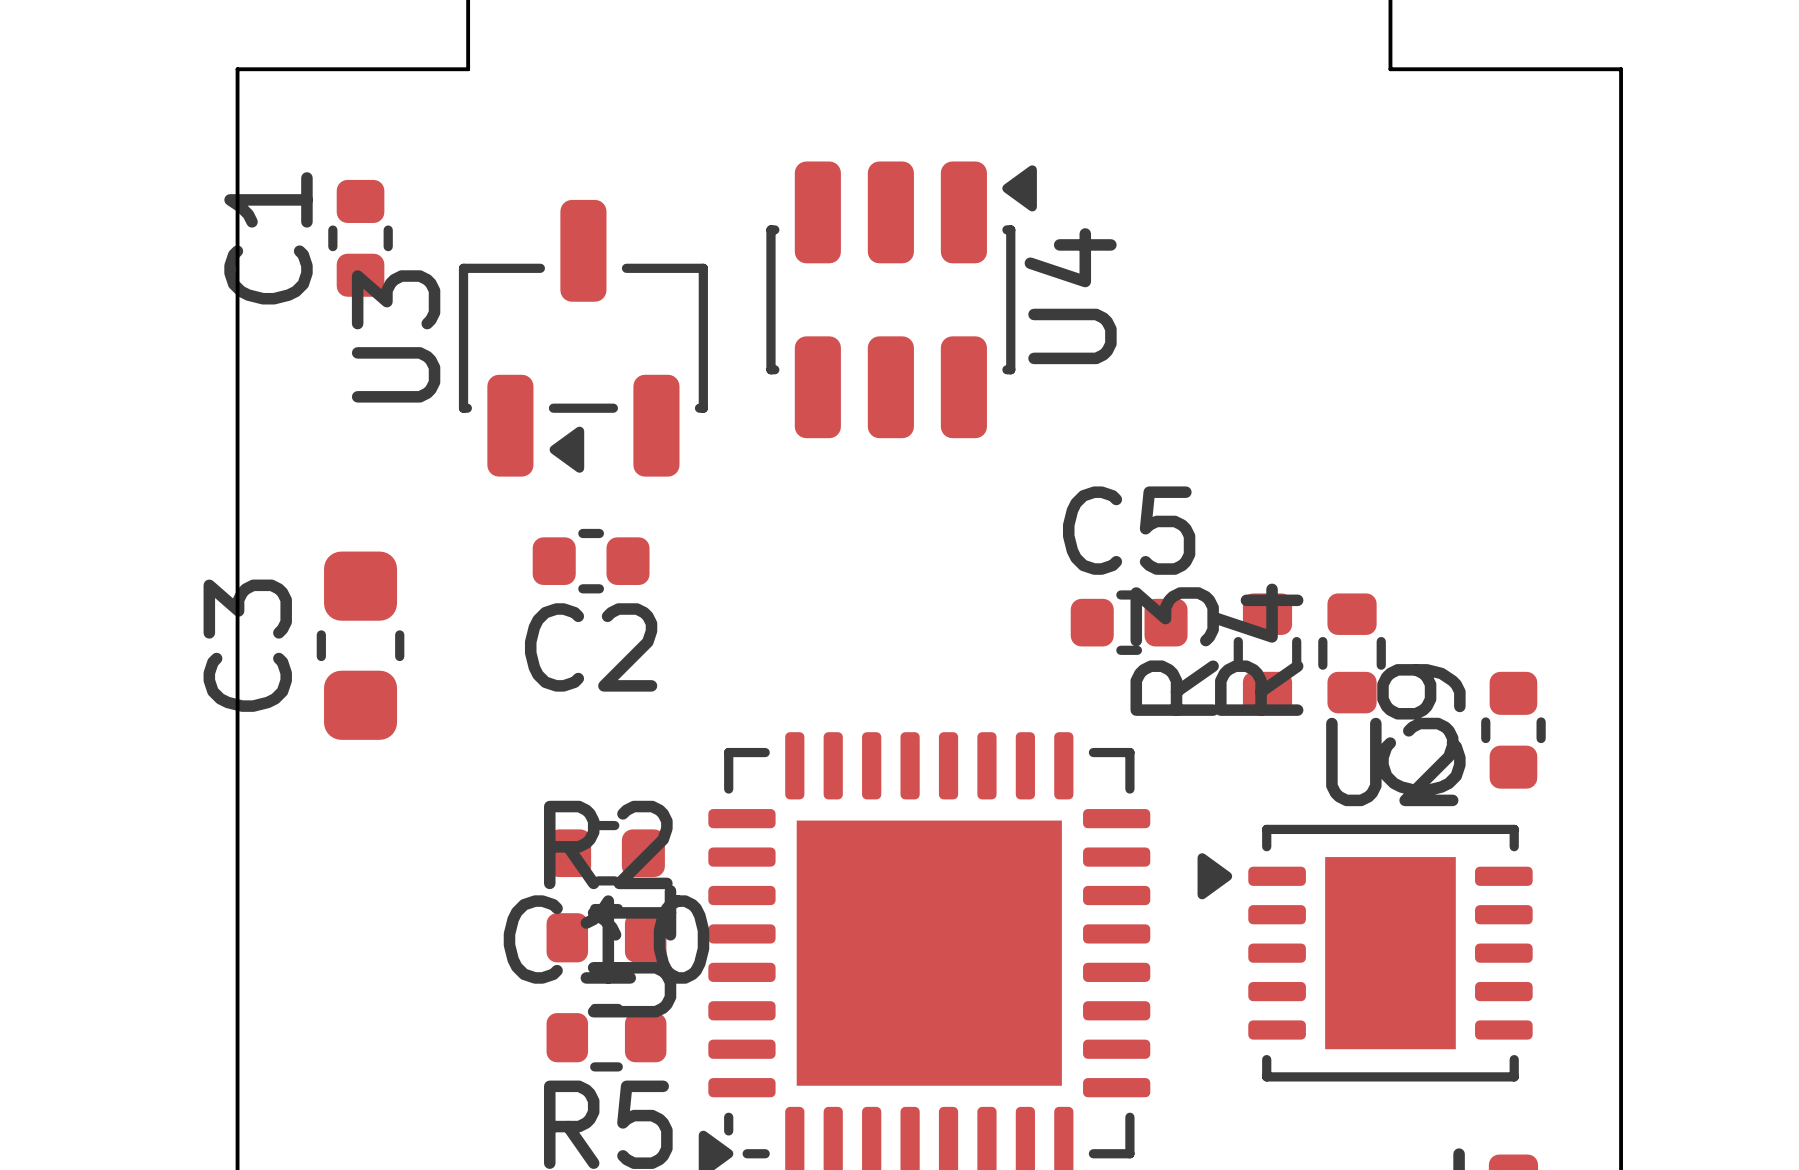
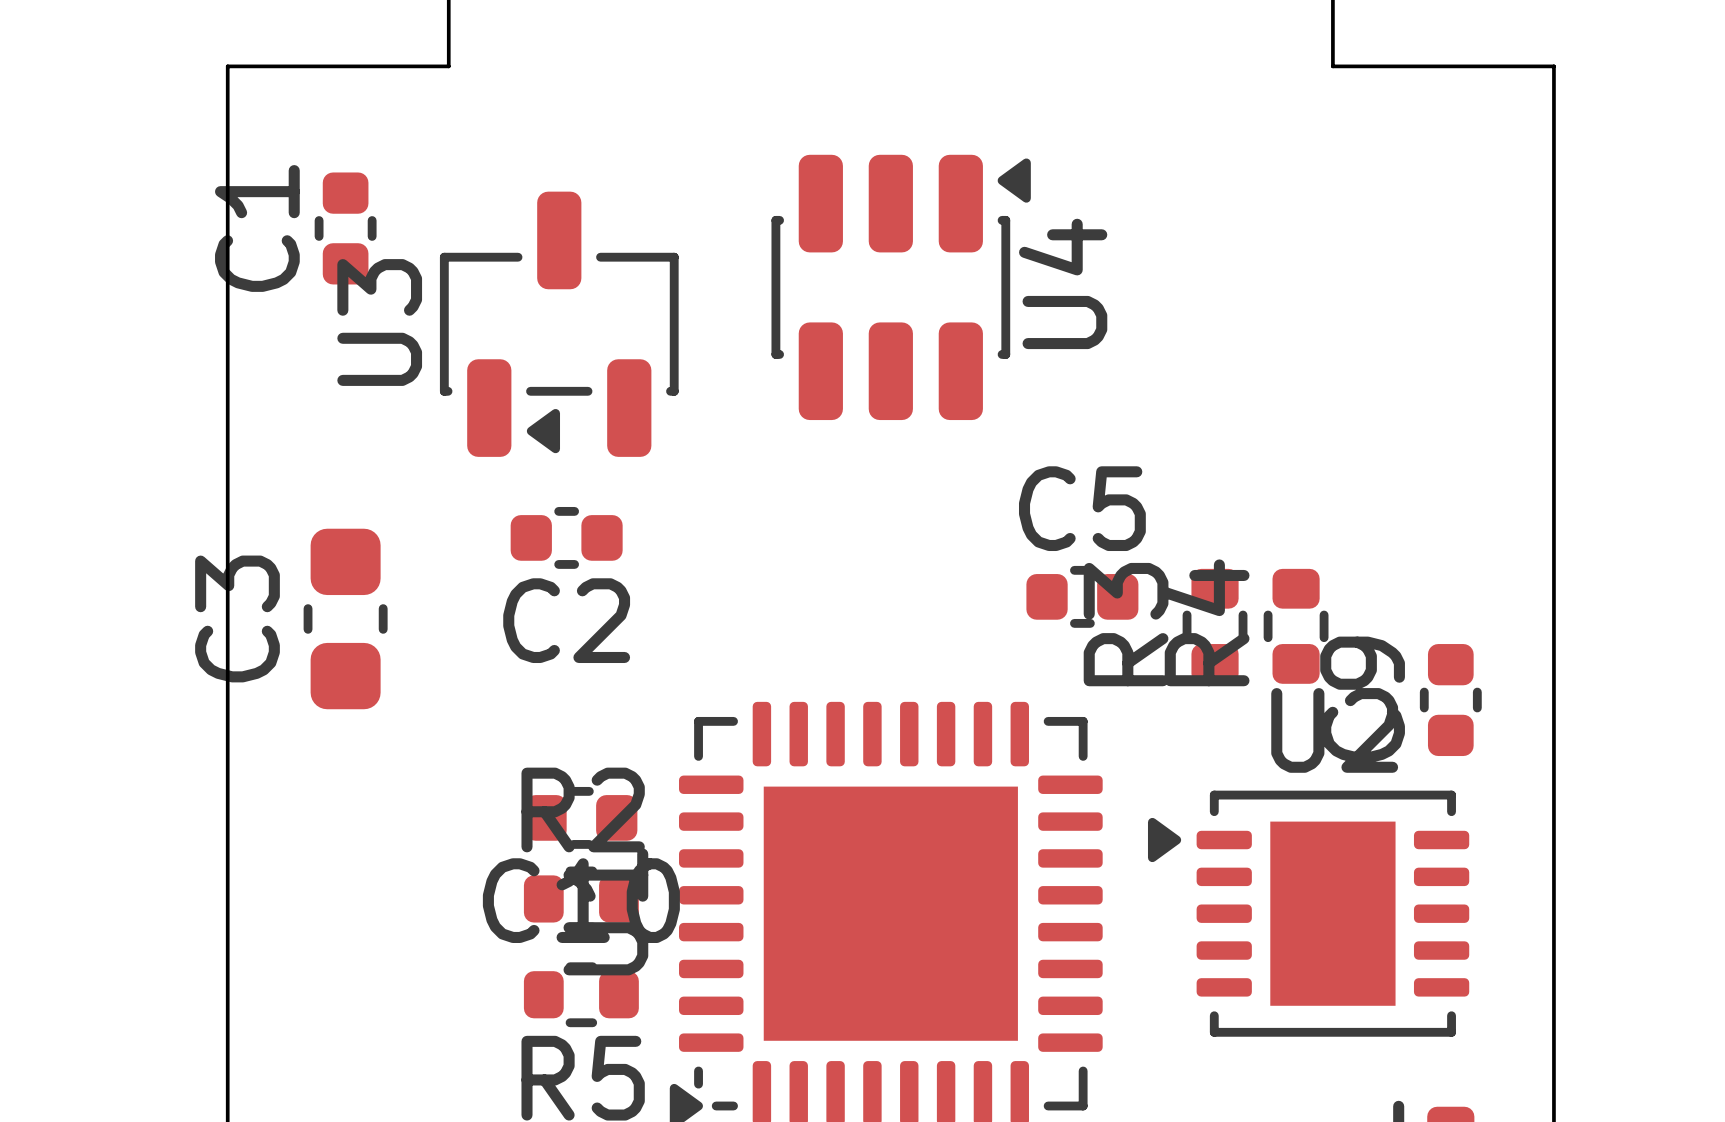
U4 position: (901, 299) -> (901, 287)

